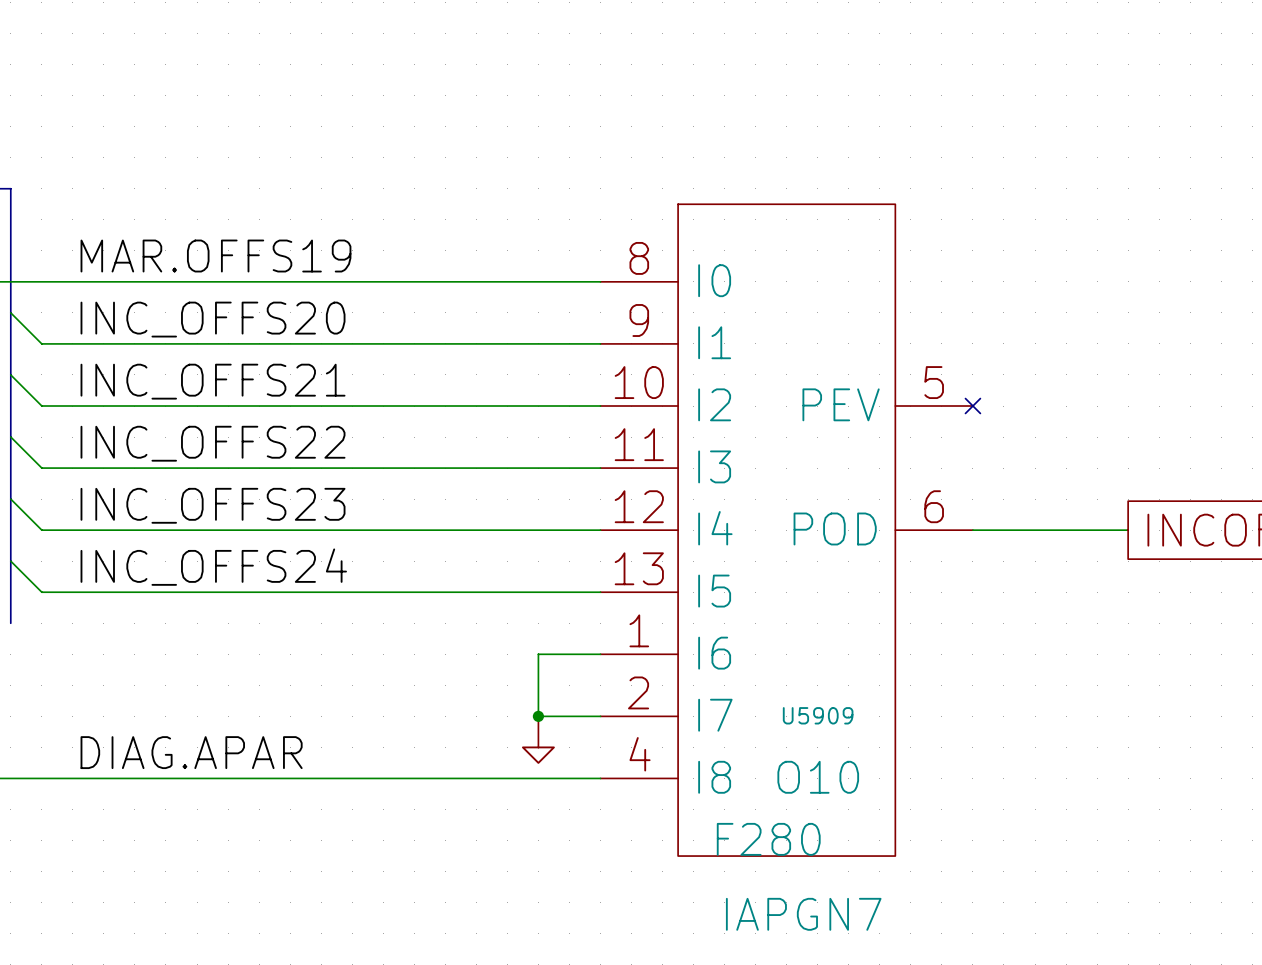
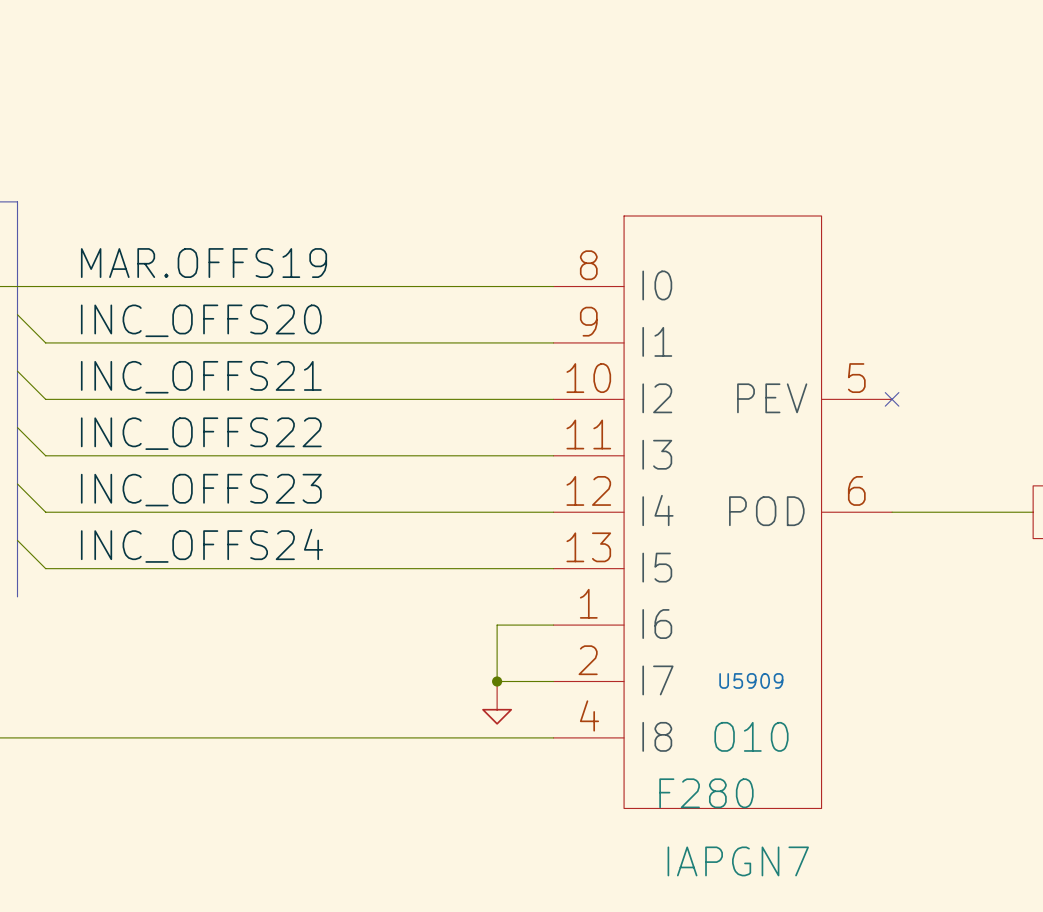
label: DIAG.APAR (191, 752) -> none

